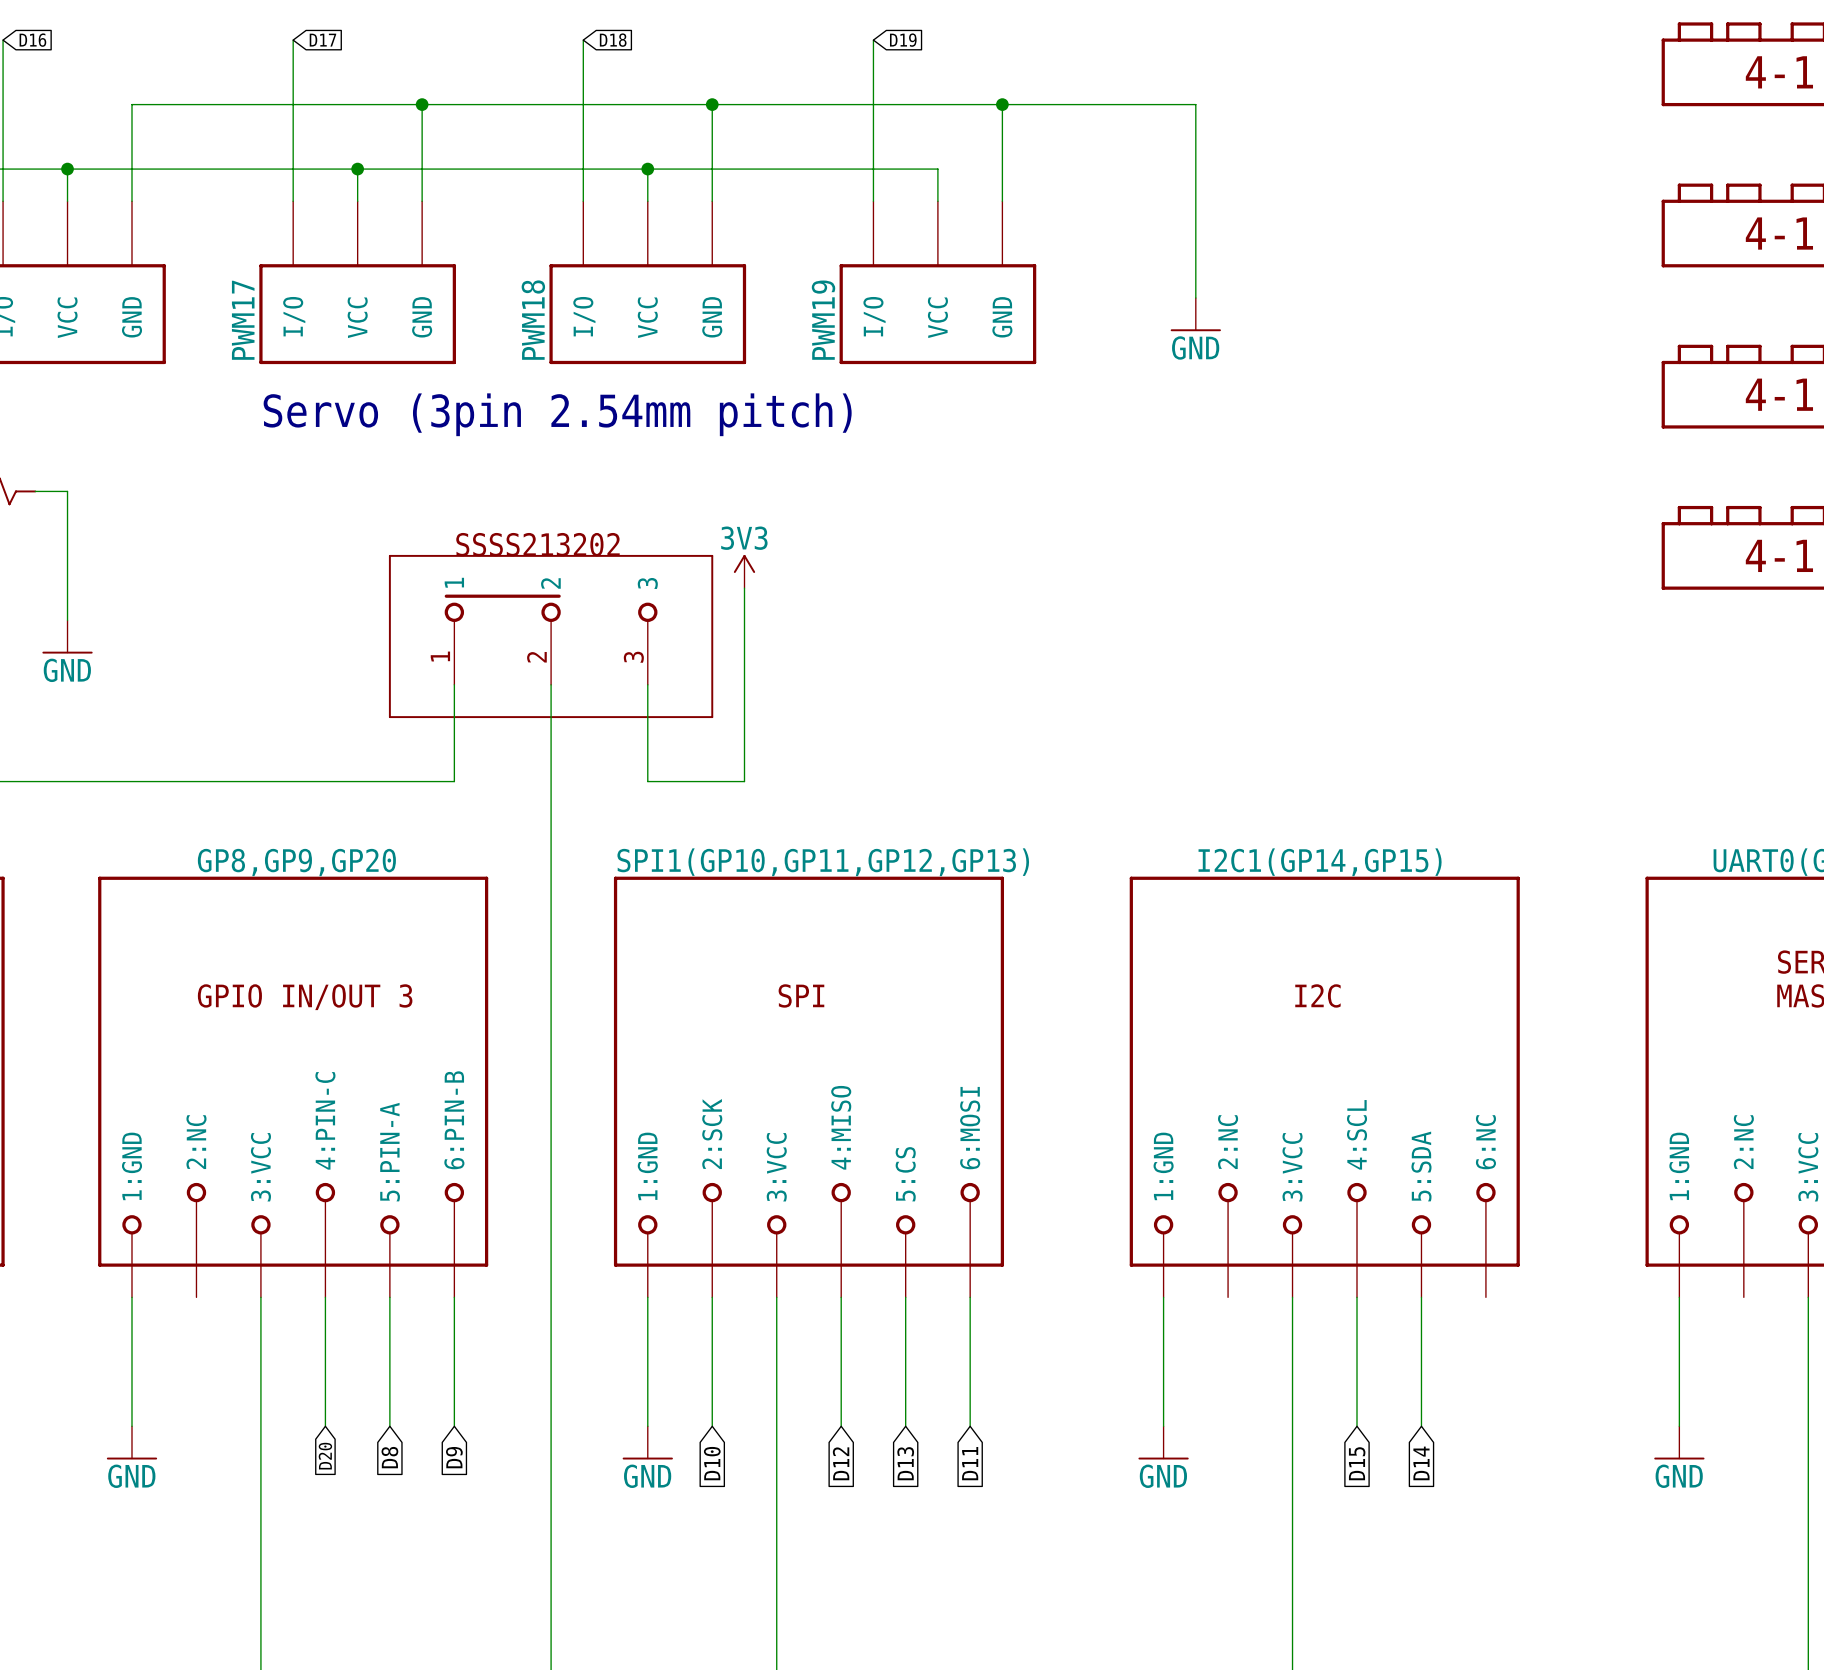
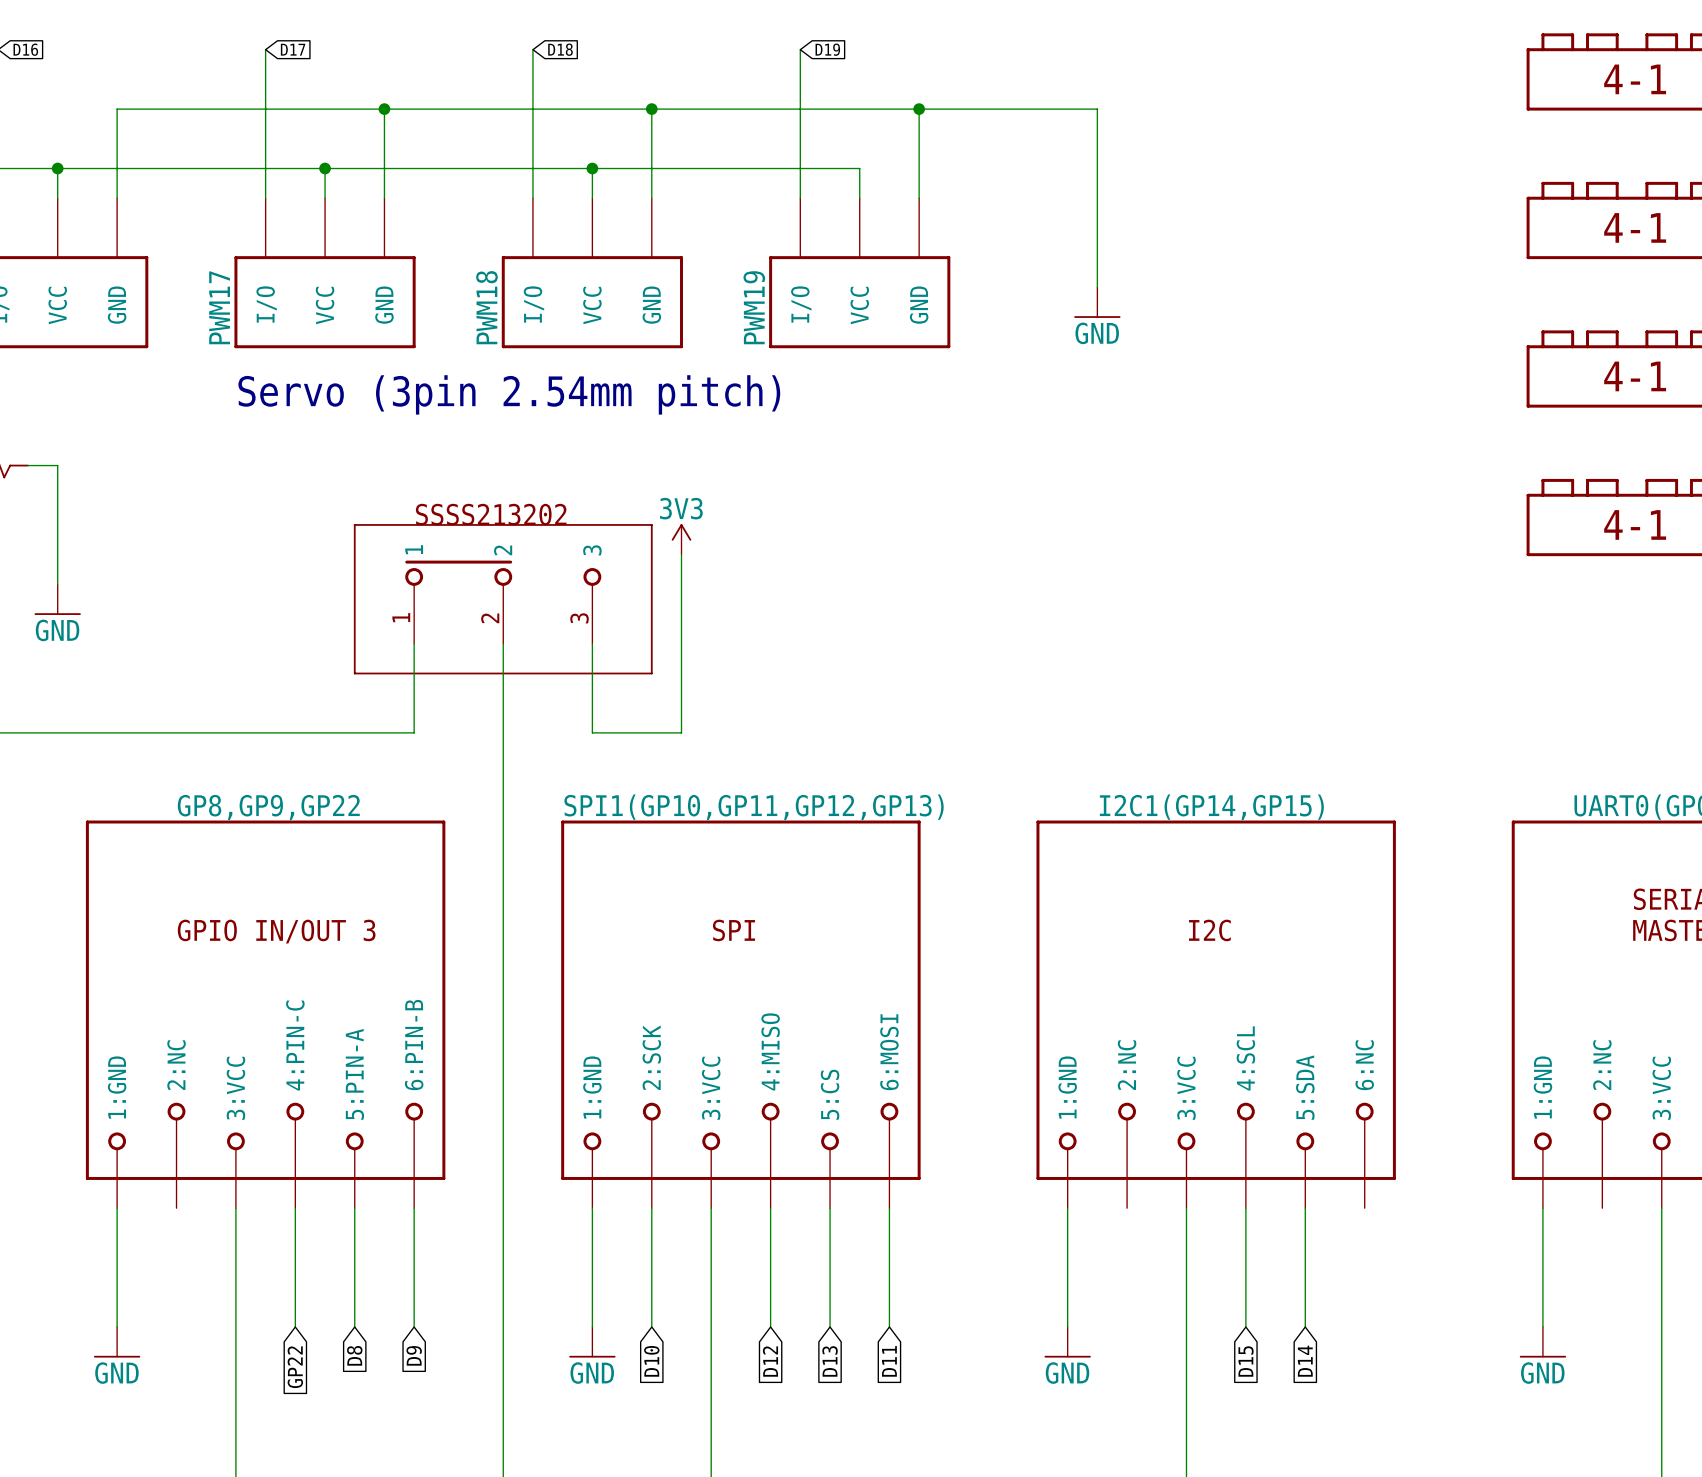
GP8,GP9,GP20 name: GP8,GP9,GP20 (296, 862) -> GP8,GP9,GP22 (268, 807)
global label: D20 (325, 1456) -> GP22 (295, 1367)

